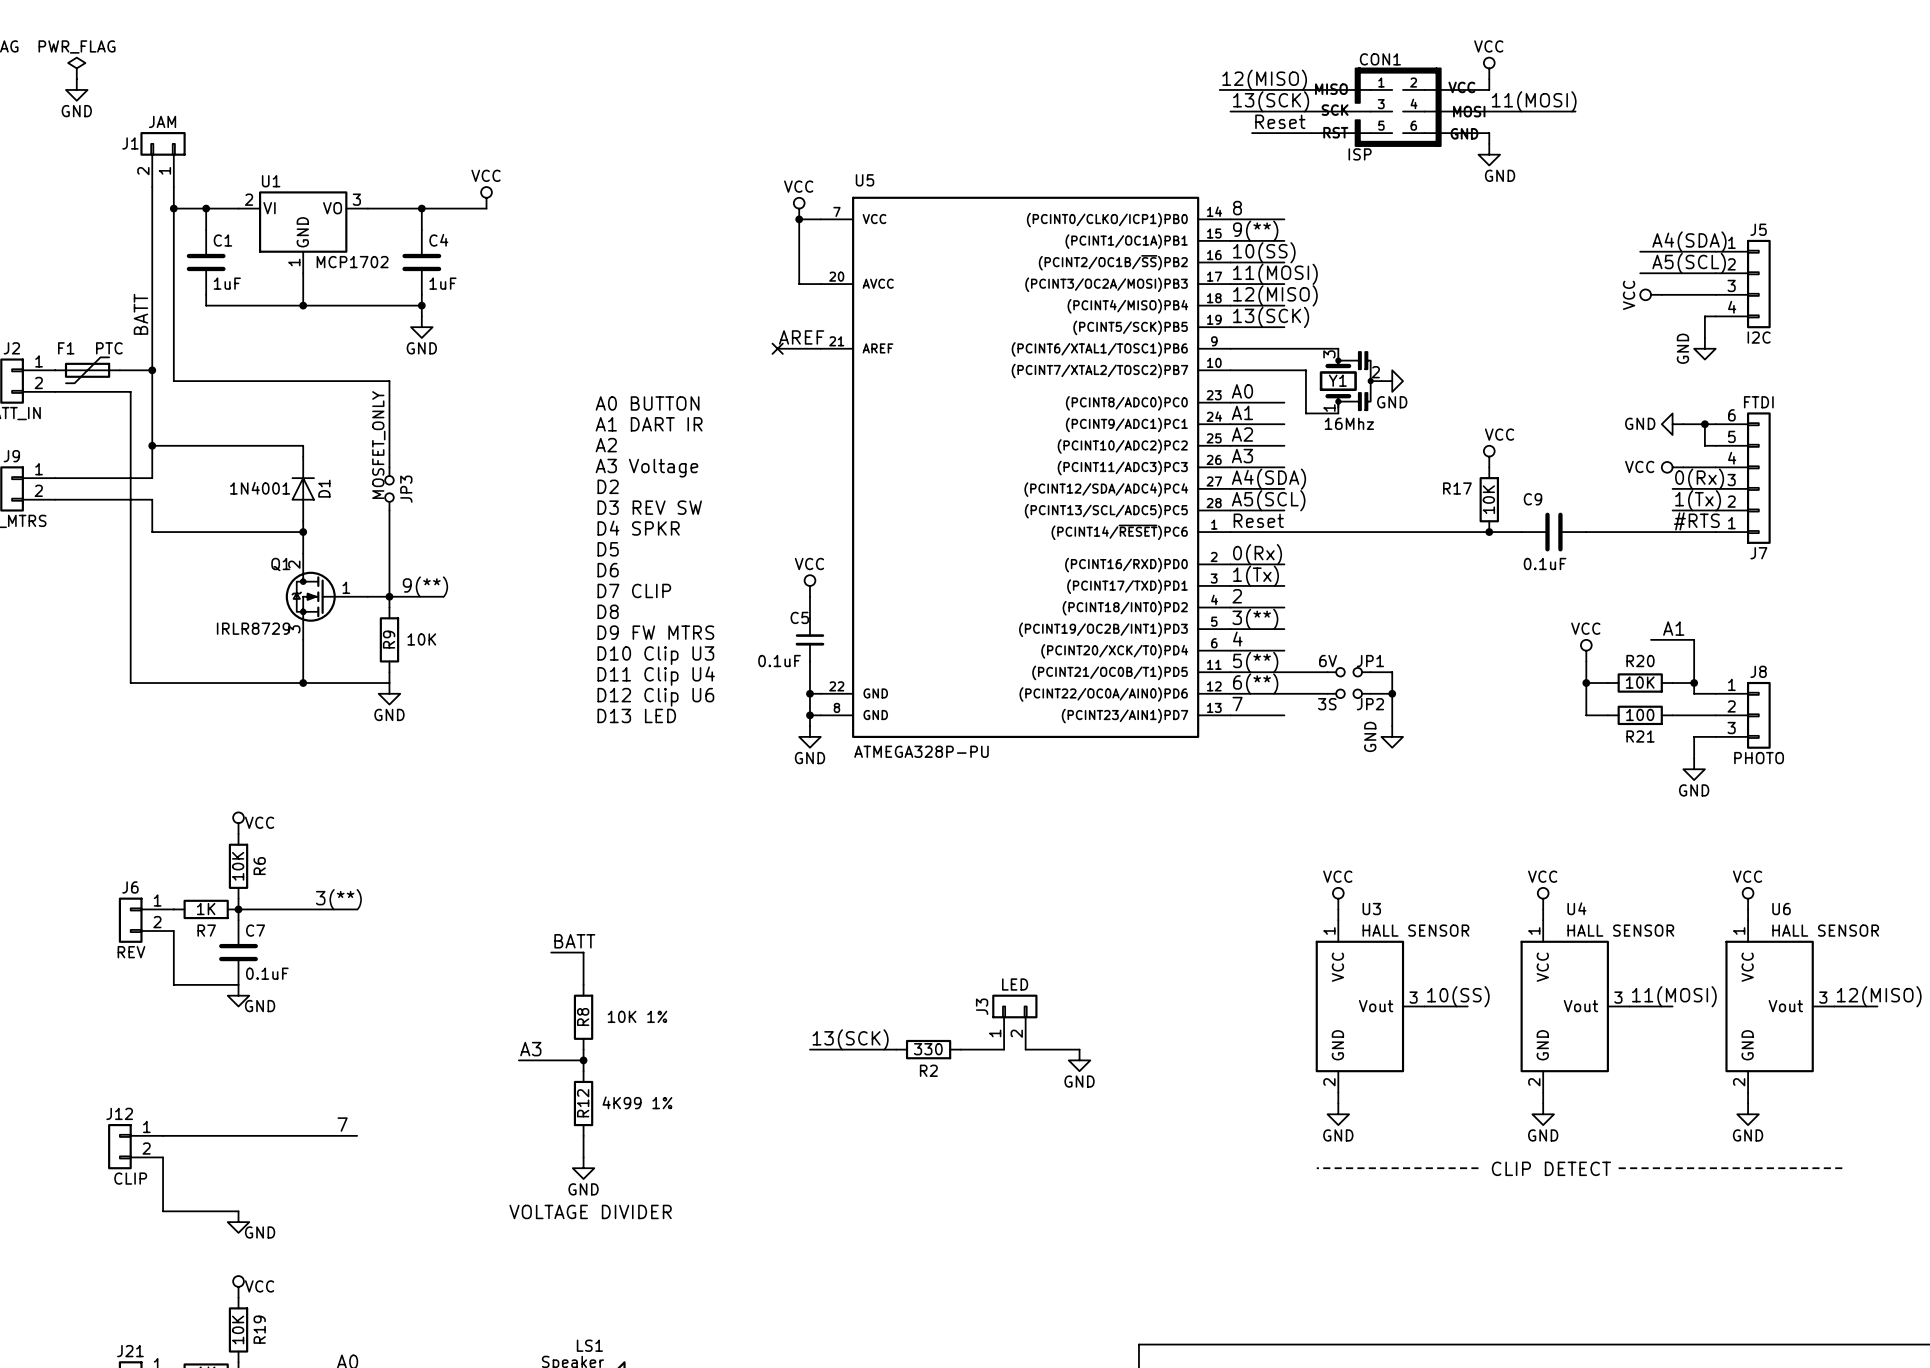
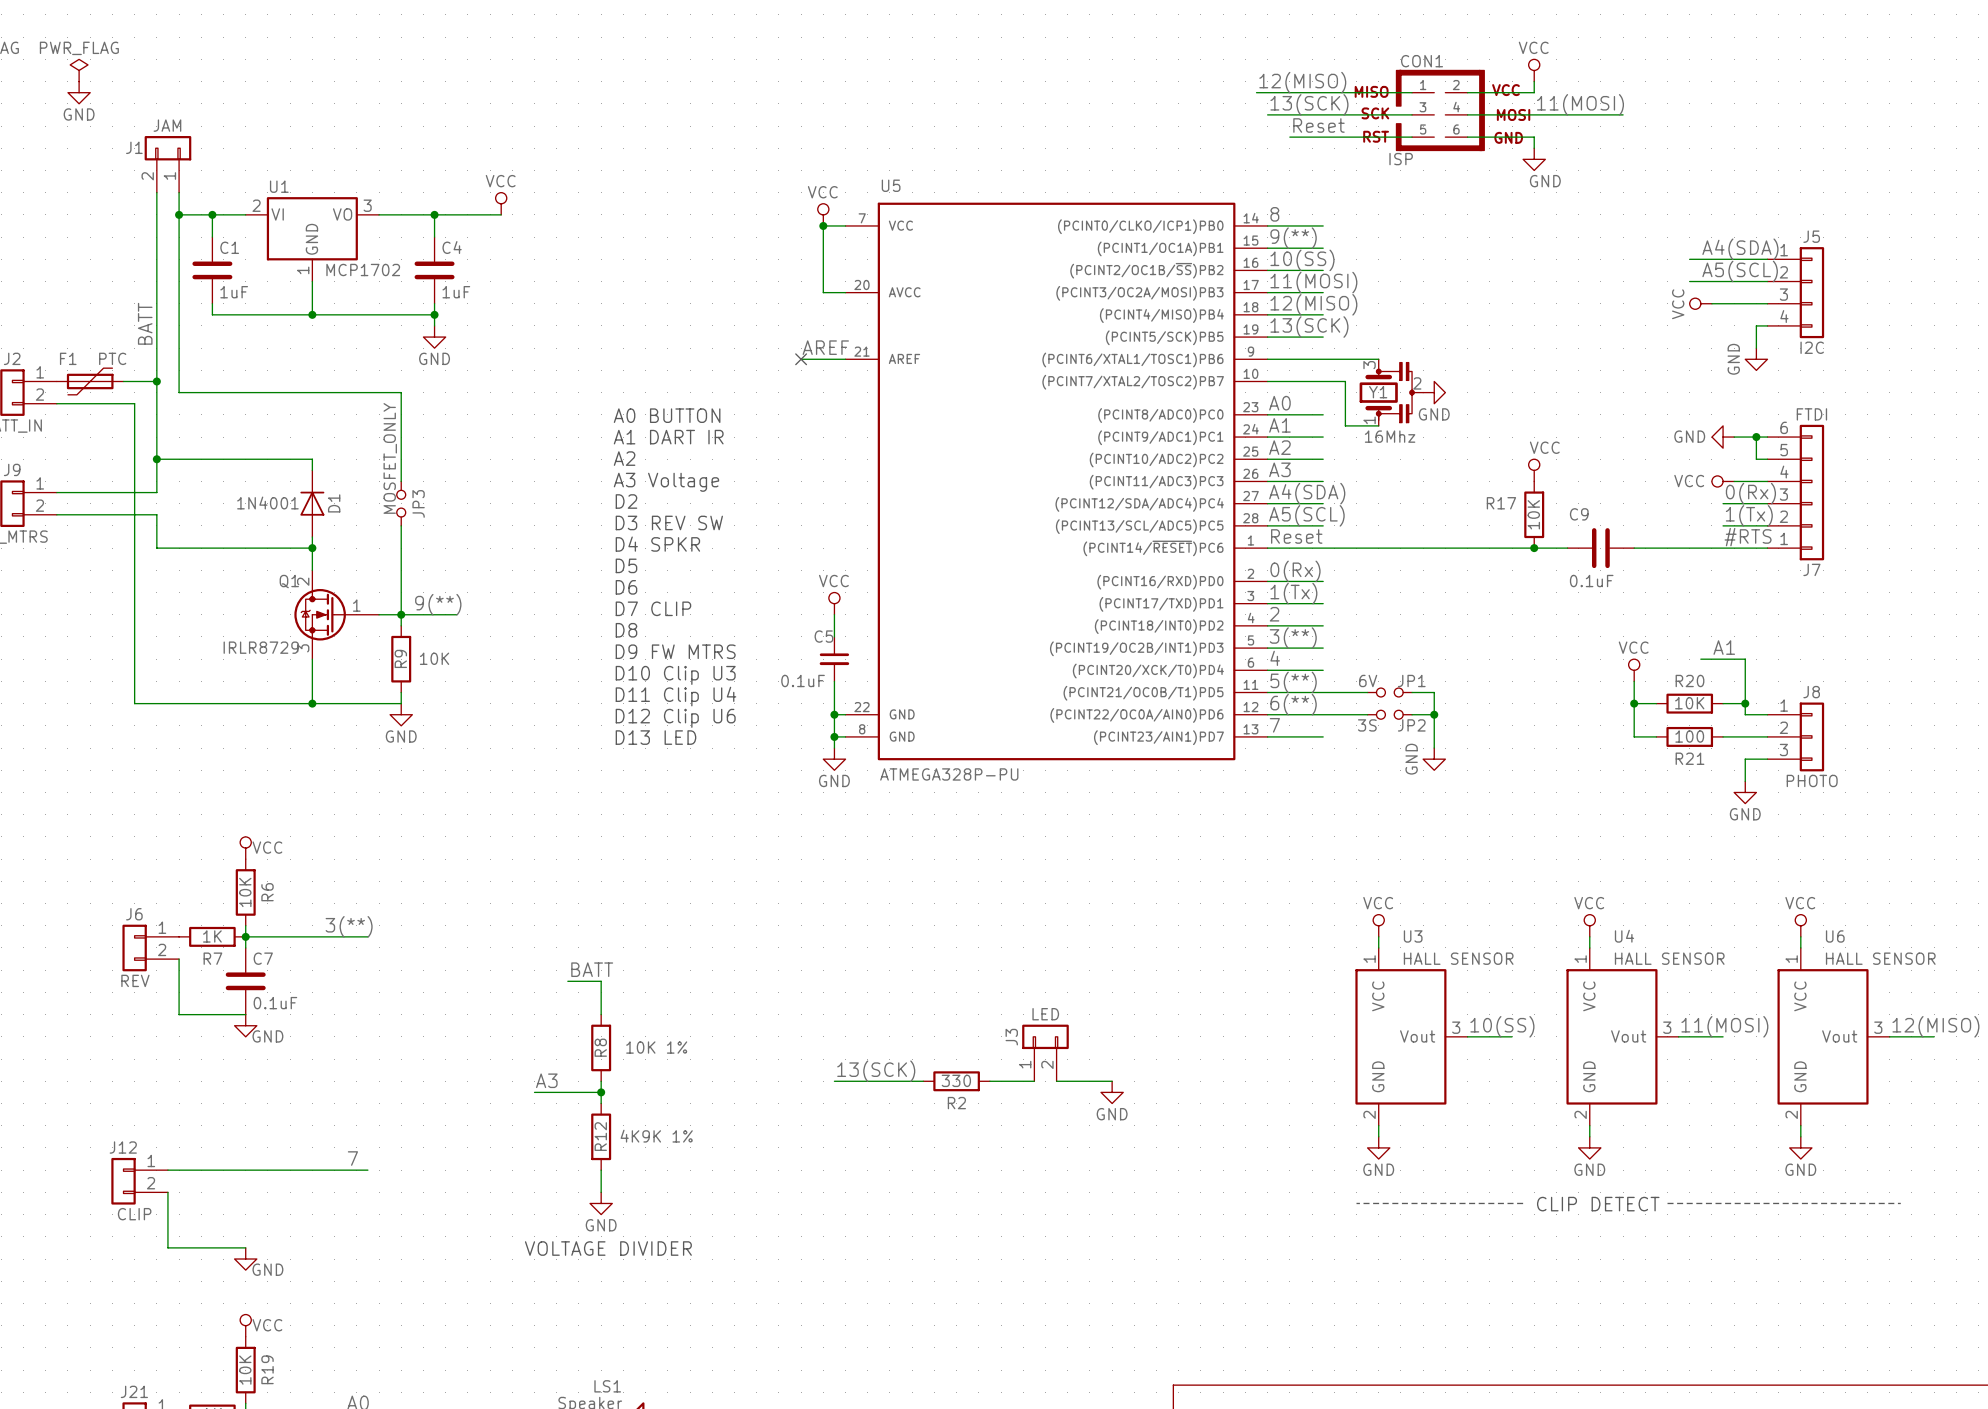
R12 value: 4K99 1% (637, 1102) -> 4K9K 1% (656, 1136)

